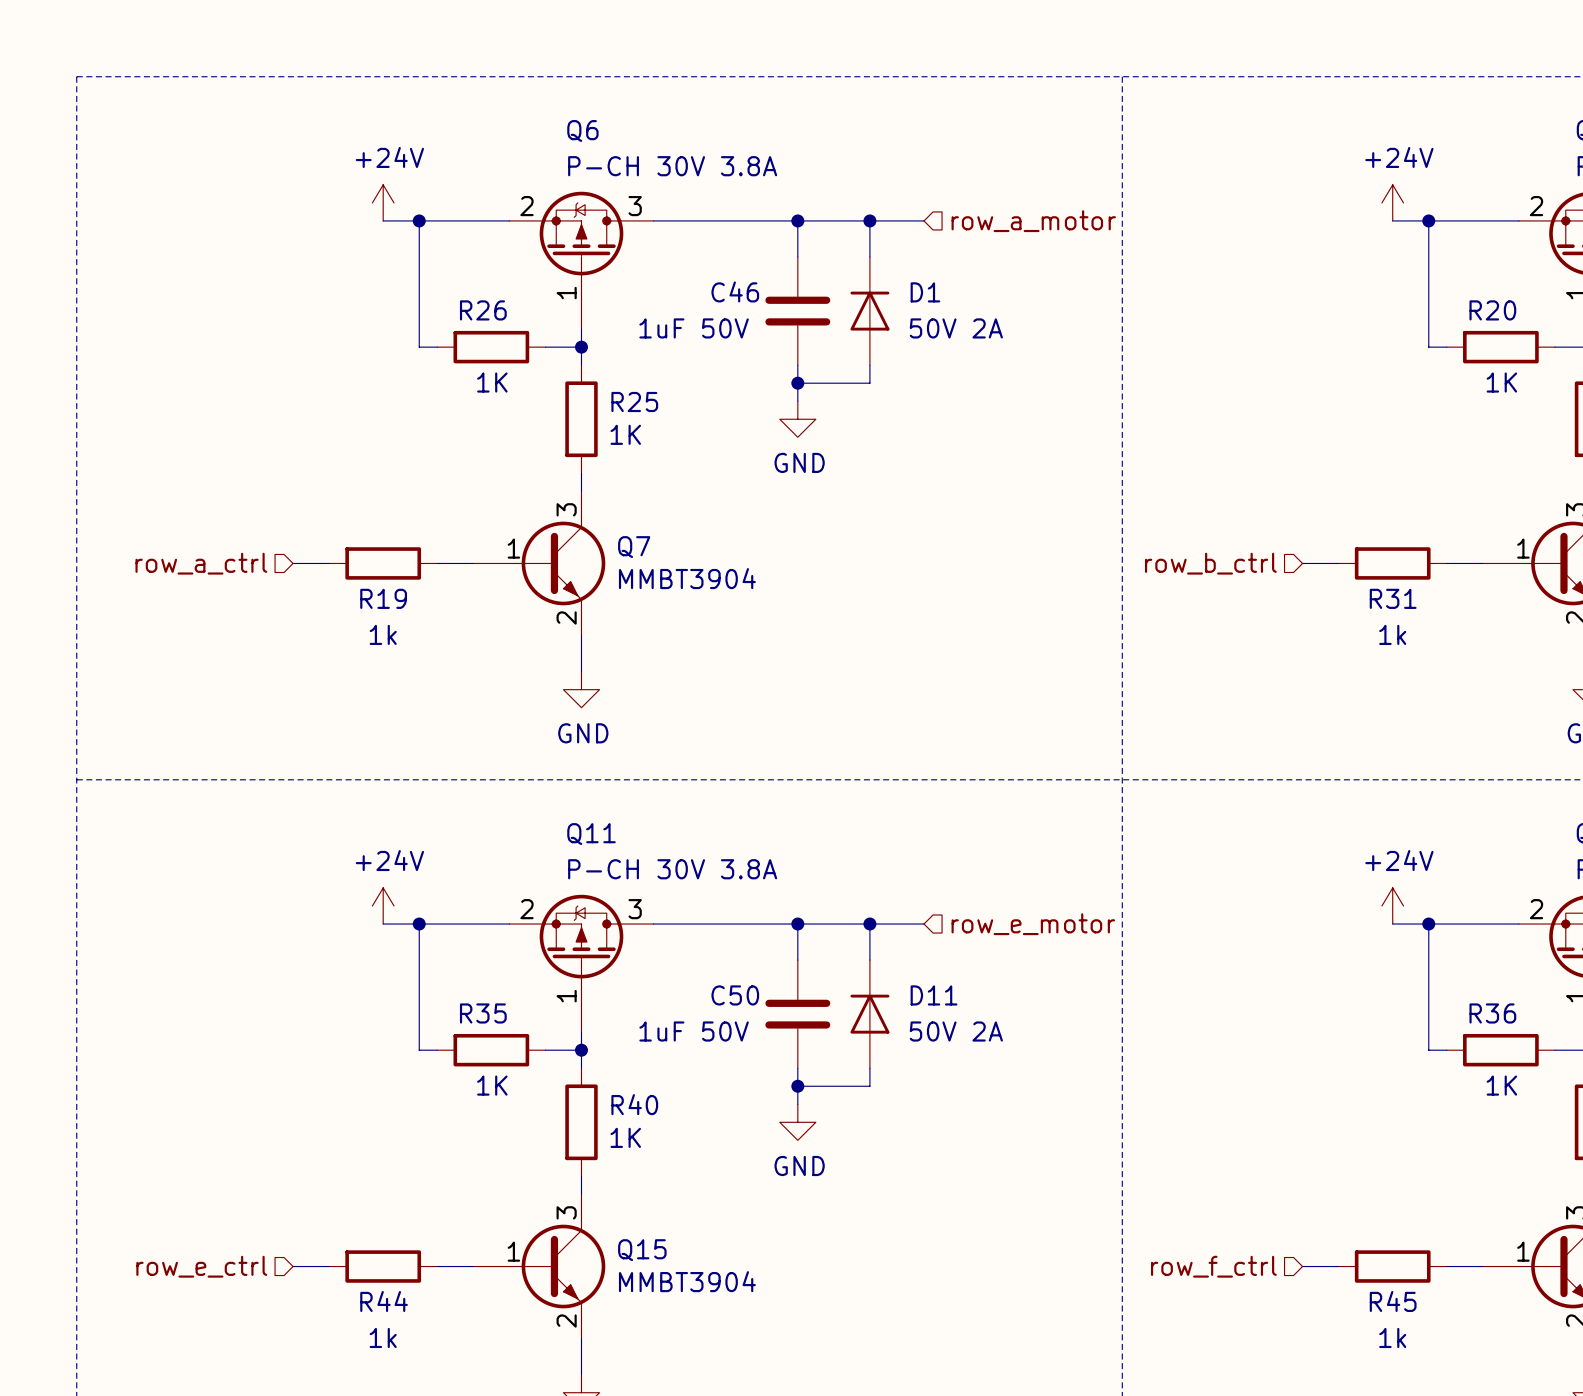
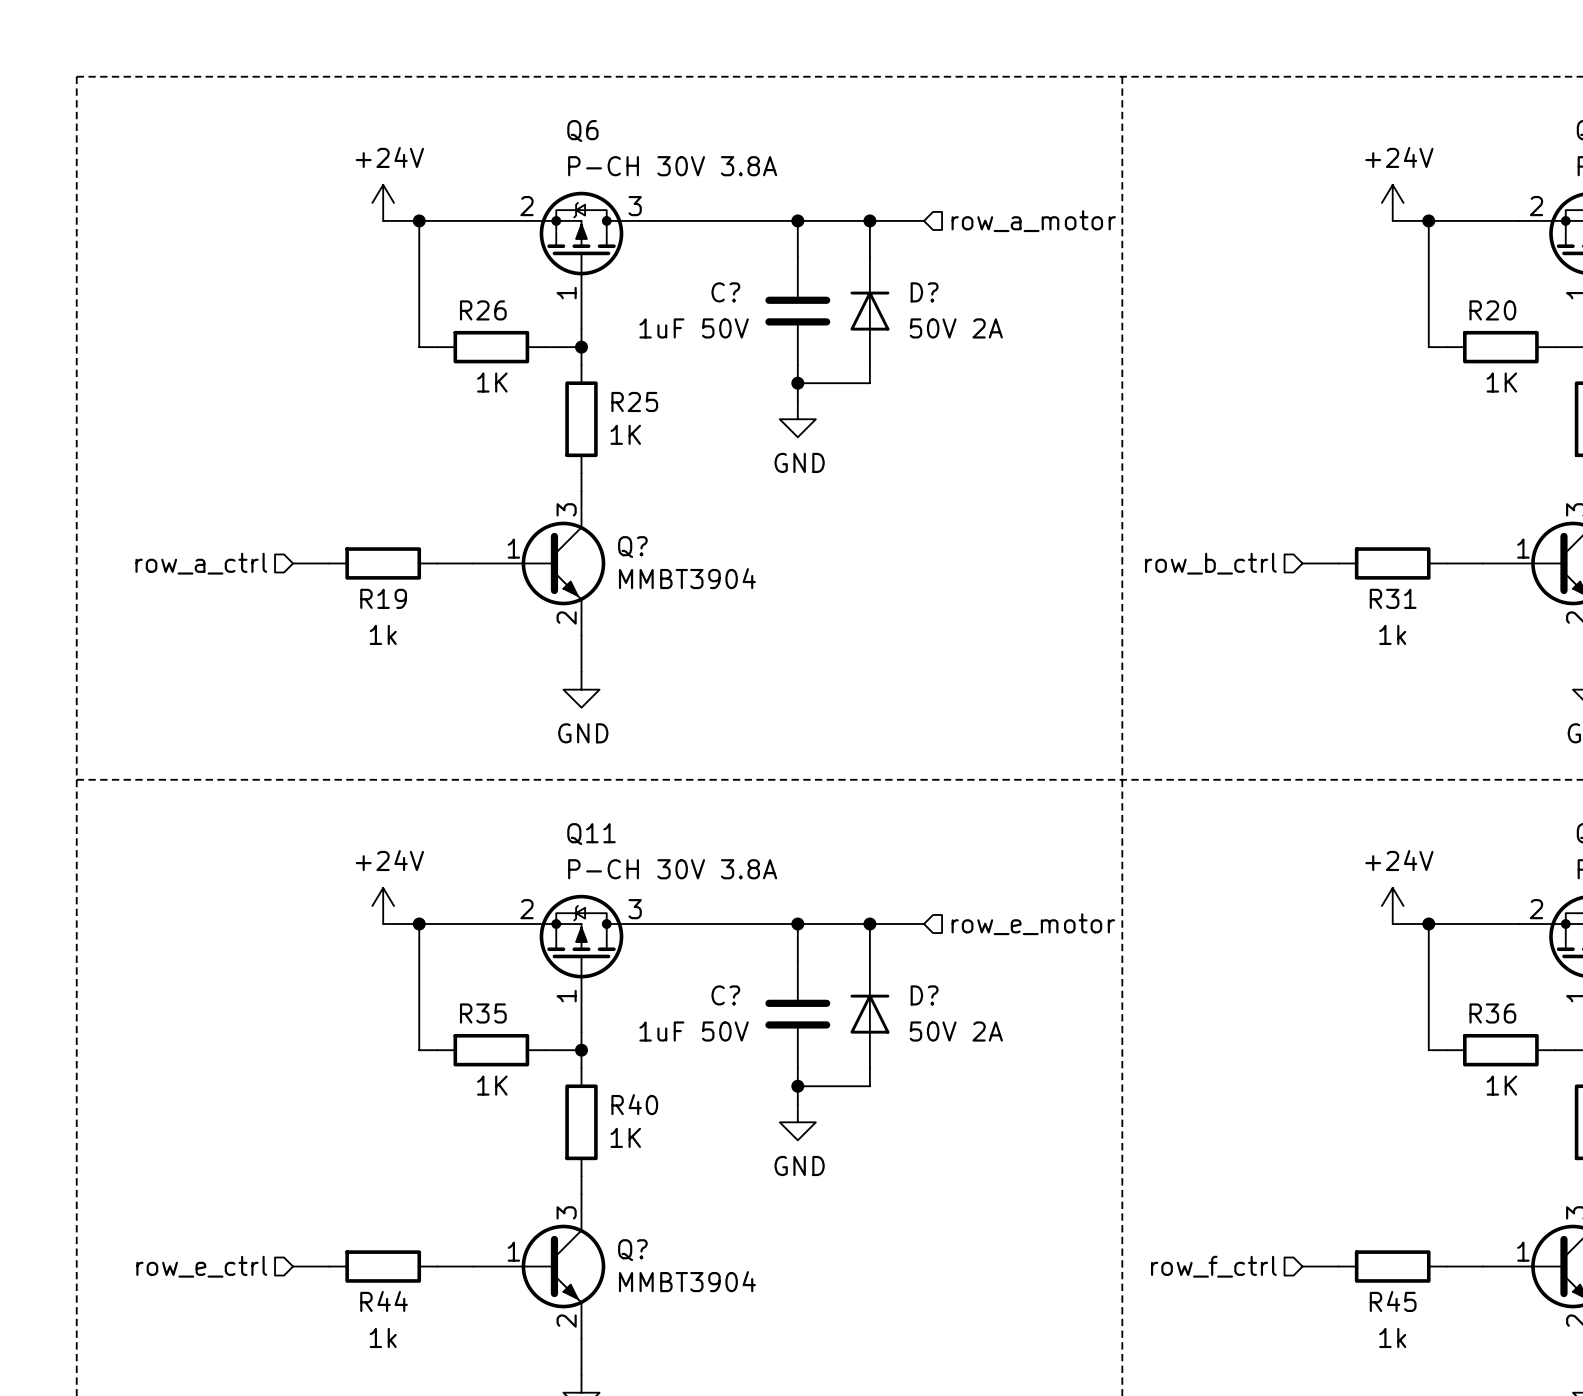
C46 name: C46 (735, 291) -> C? (725, 292)
D1 name: D1 (925, 292) -> D? (924, 292)
Q7 name: Q7 (634, 547) -> Q? (632, 547)
C50 name: C50 (735, 995) -> C? (725, 995)
D11 name: D11 (934, 995) -> D? (924, 995)
Q15 name: Q15 (642, 1250) -> Q? (632, 1250)

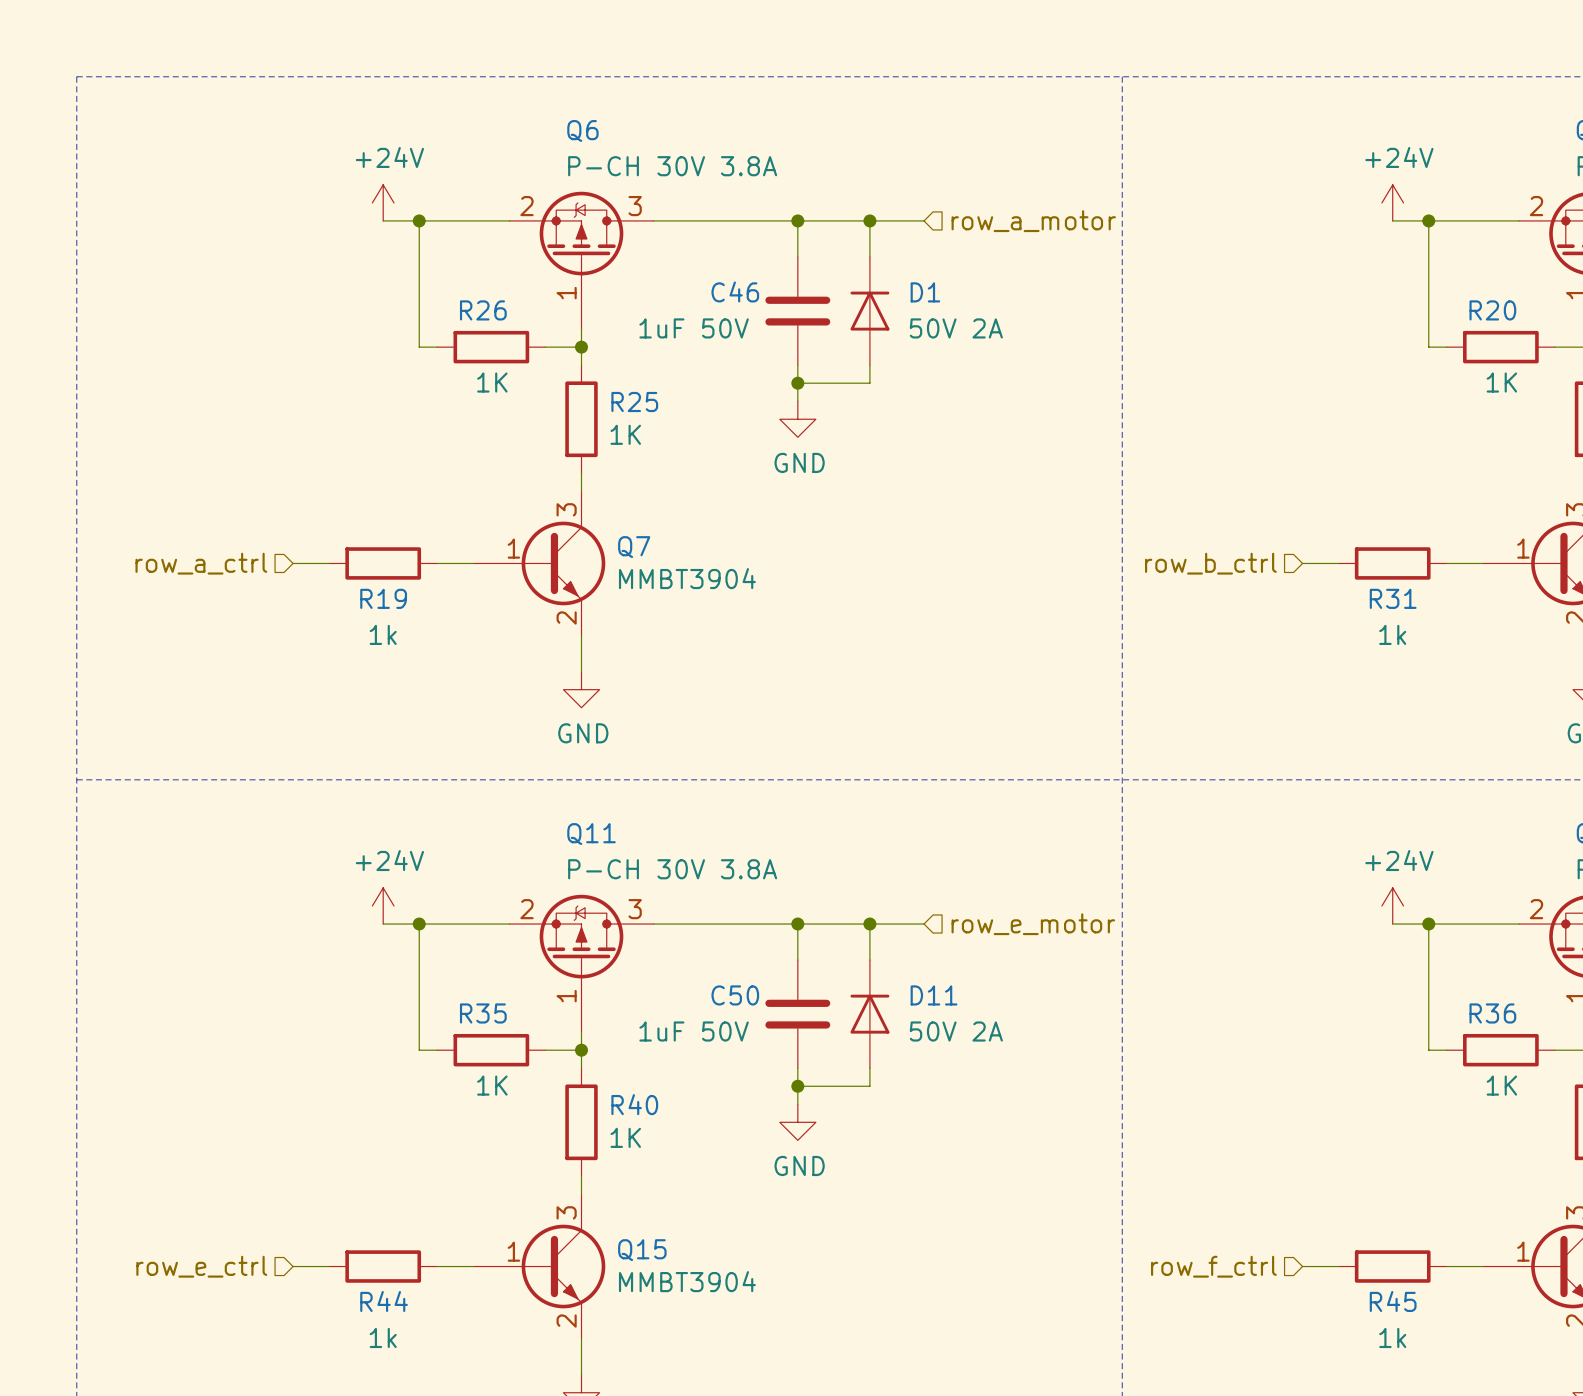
C? name: C? (725, 292) -> C46 (735, 291)
D? name: D? (924, 292) -> D1 (925, 292)
Q? name: Q? (632, 547) -> Q7 (634, 547)
C? name: C? (725, 995) -> C50 (735, 995)
D? name: D? (924, 995) -> D11 (934, 995)
Q? name: Q? (632, 1250) -> Q15 (642, 1250)

